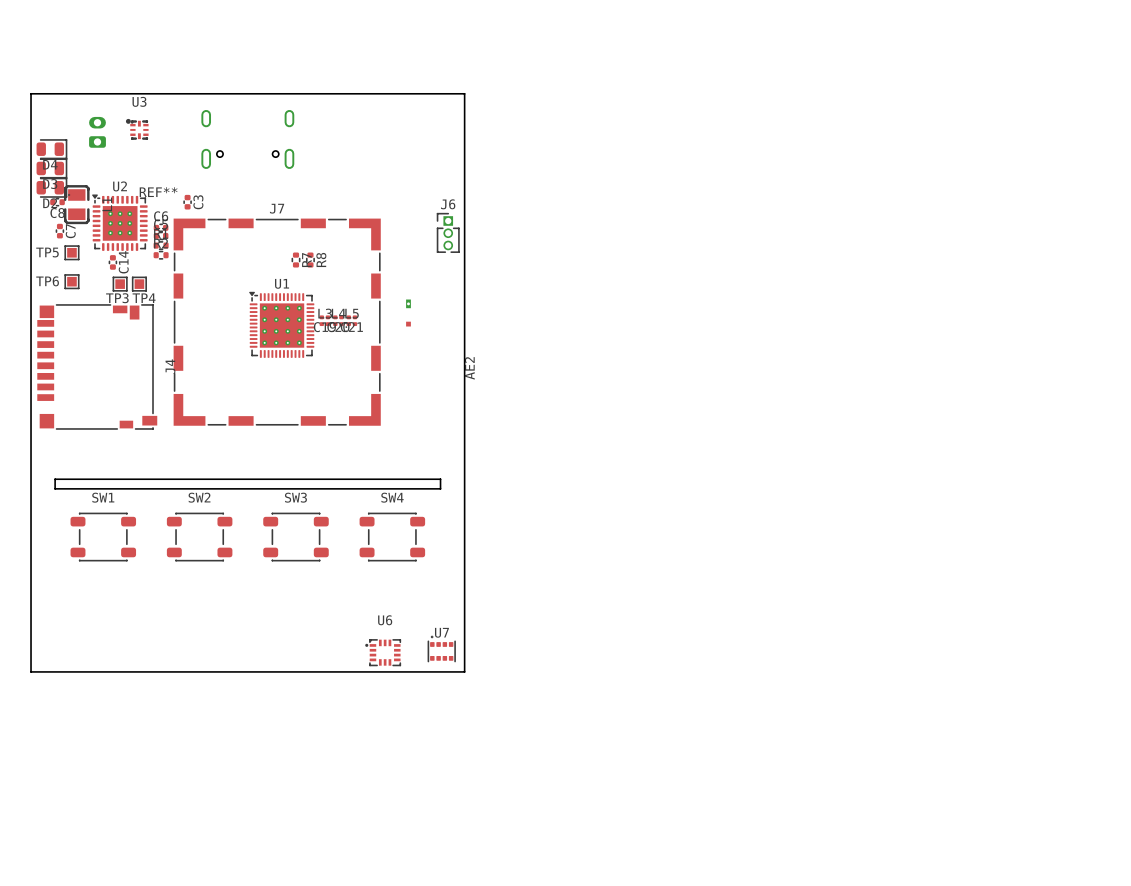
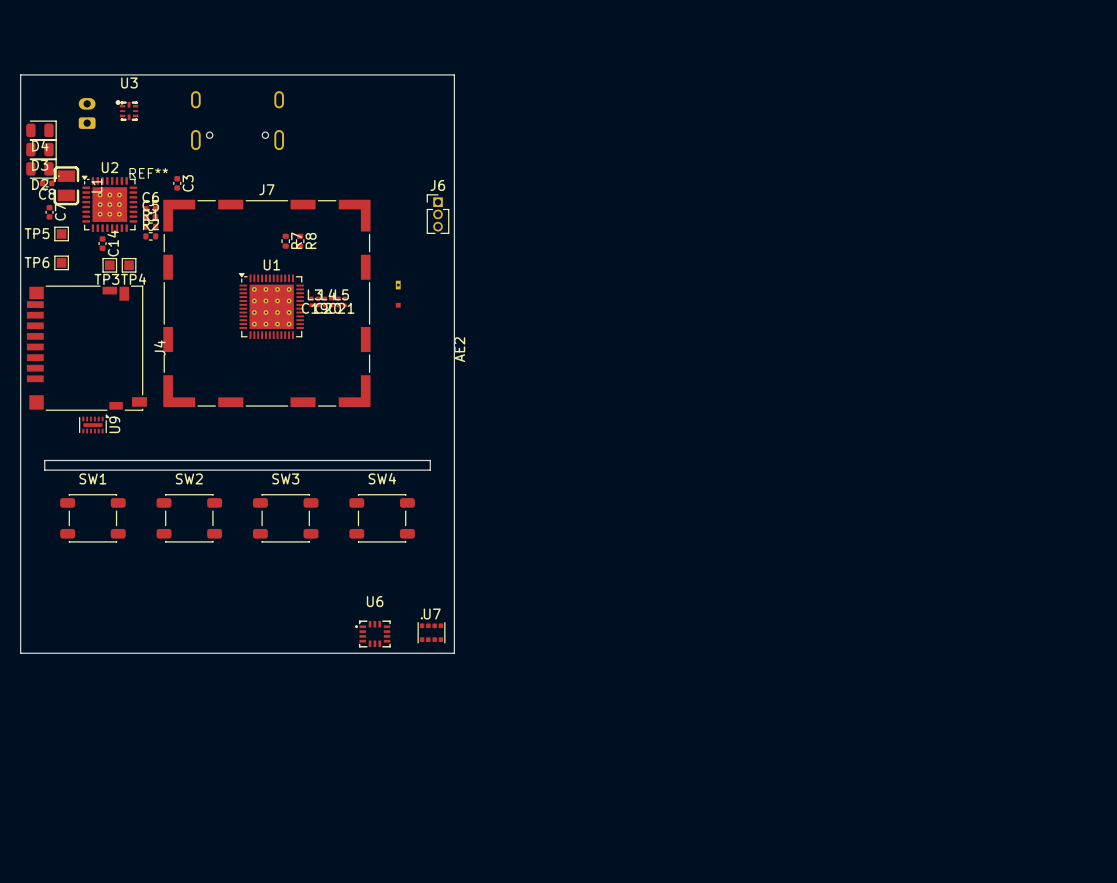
U9: none -> (94, 423)

